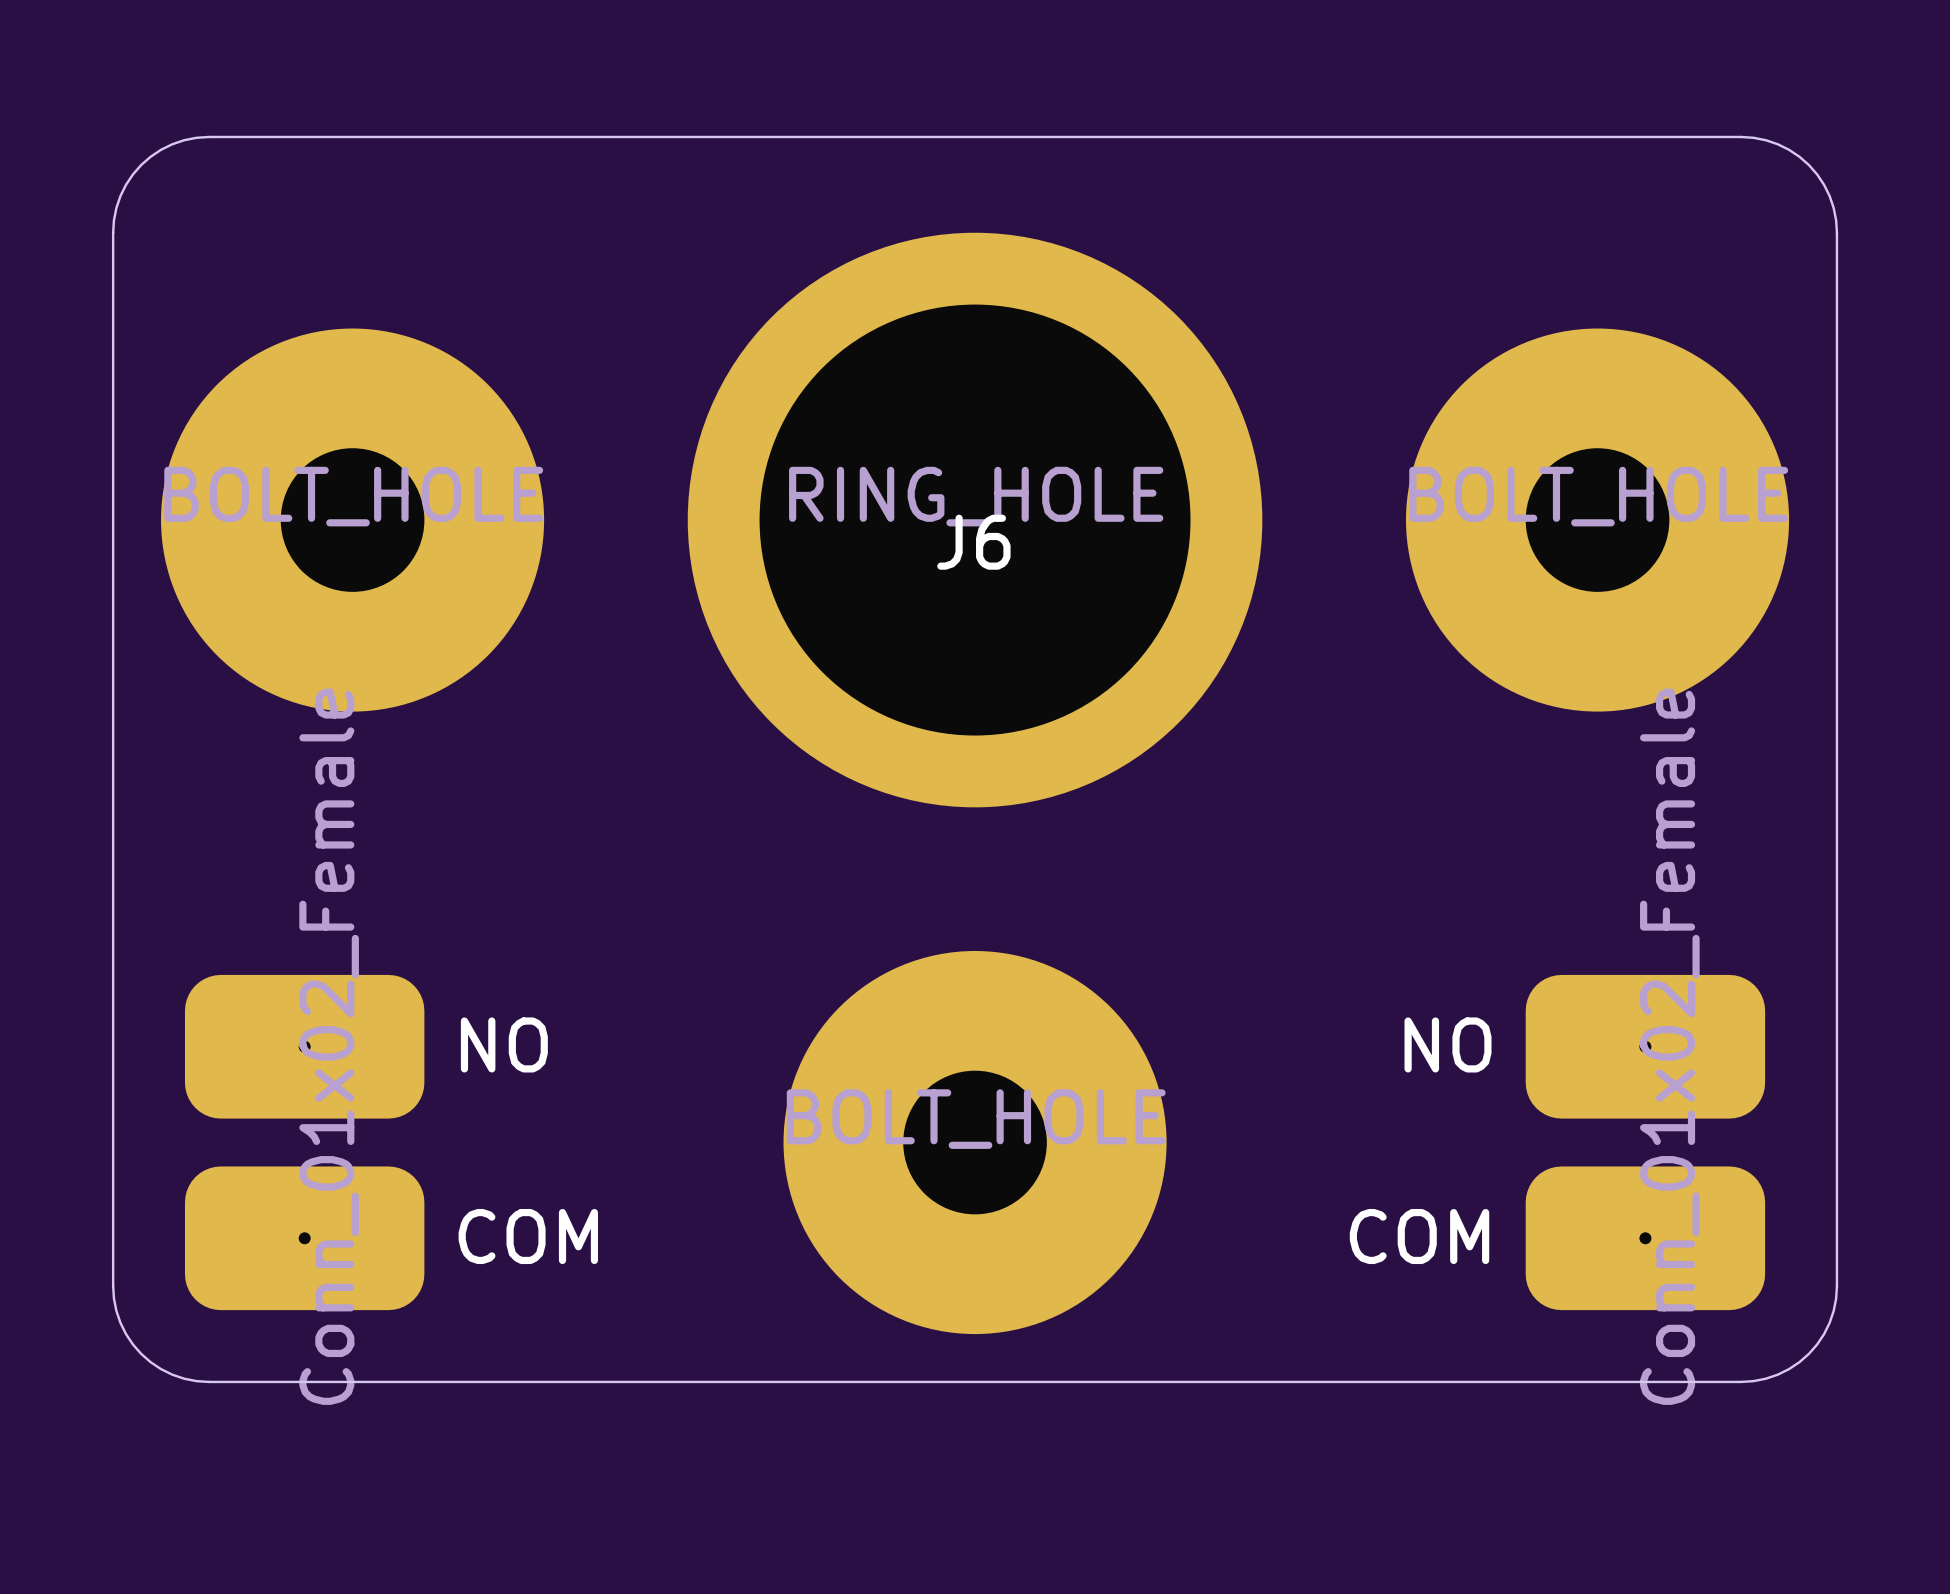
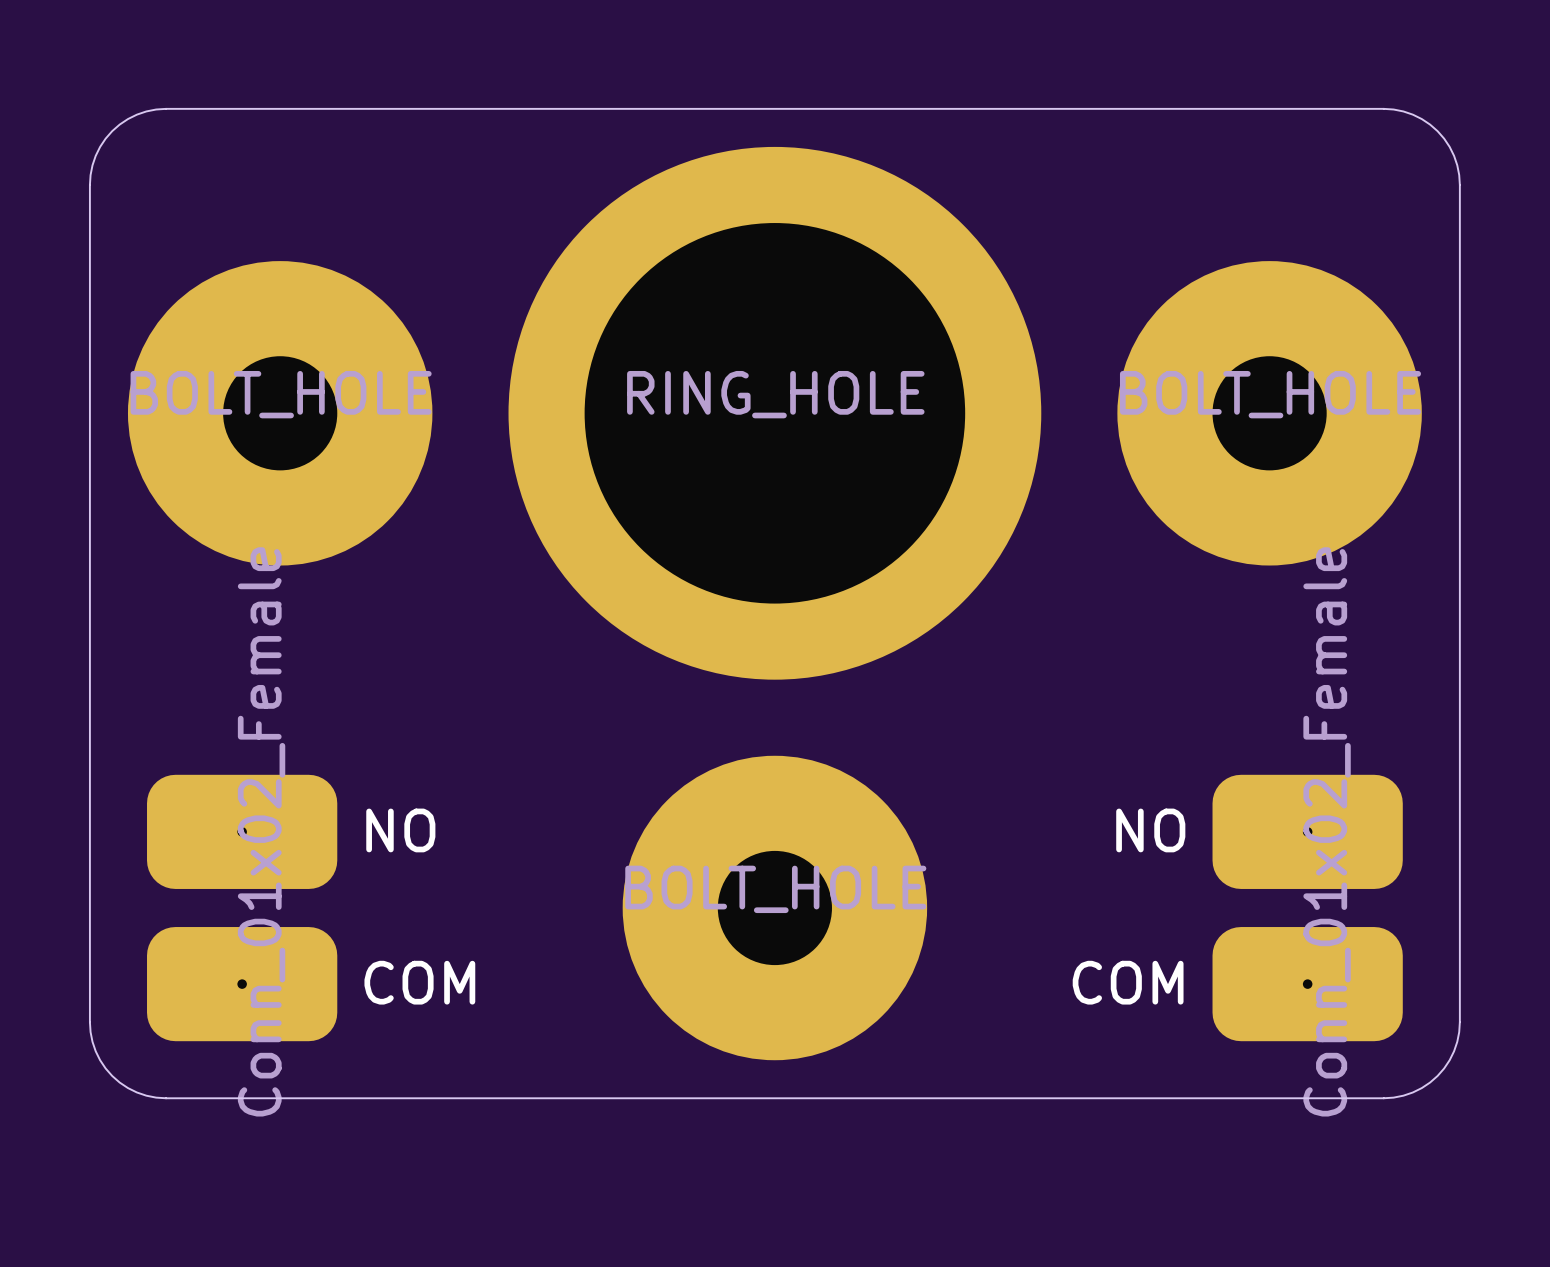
J6: RING_HOLE (975, 520) -> none
part: none -> RING_HOLE (774, 413)

